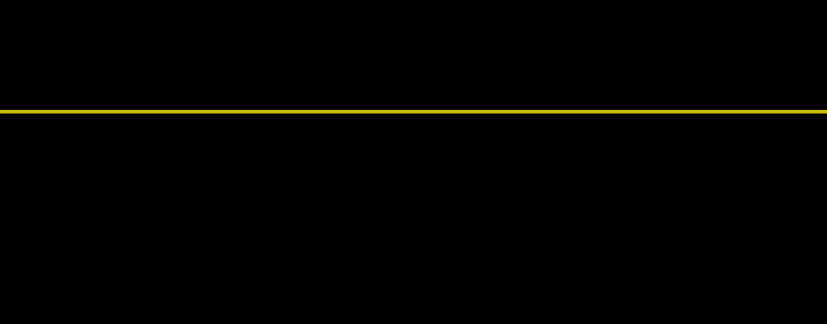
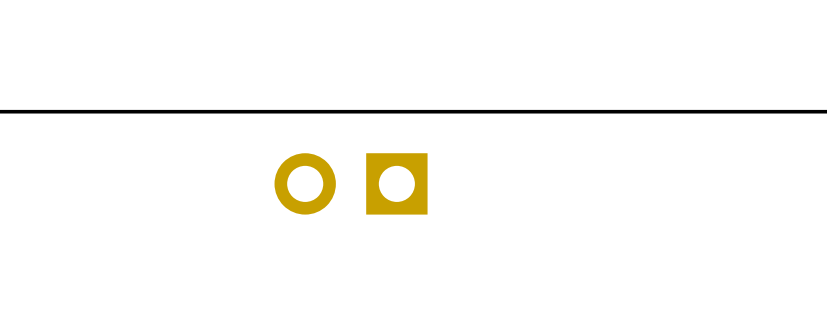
part: none -> (351, 183)

